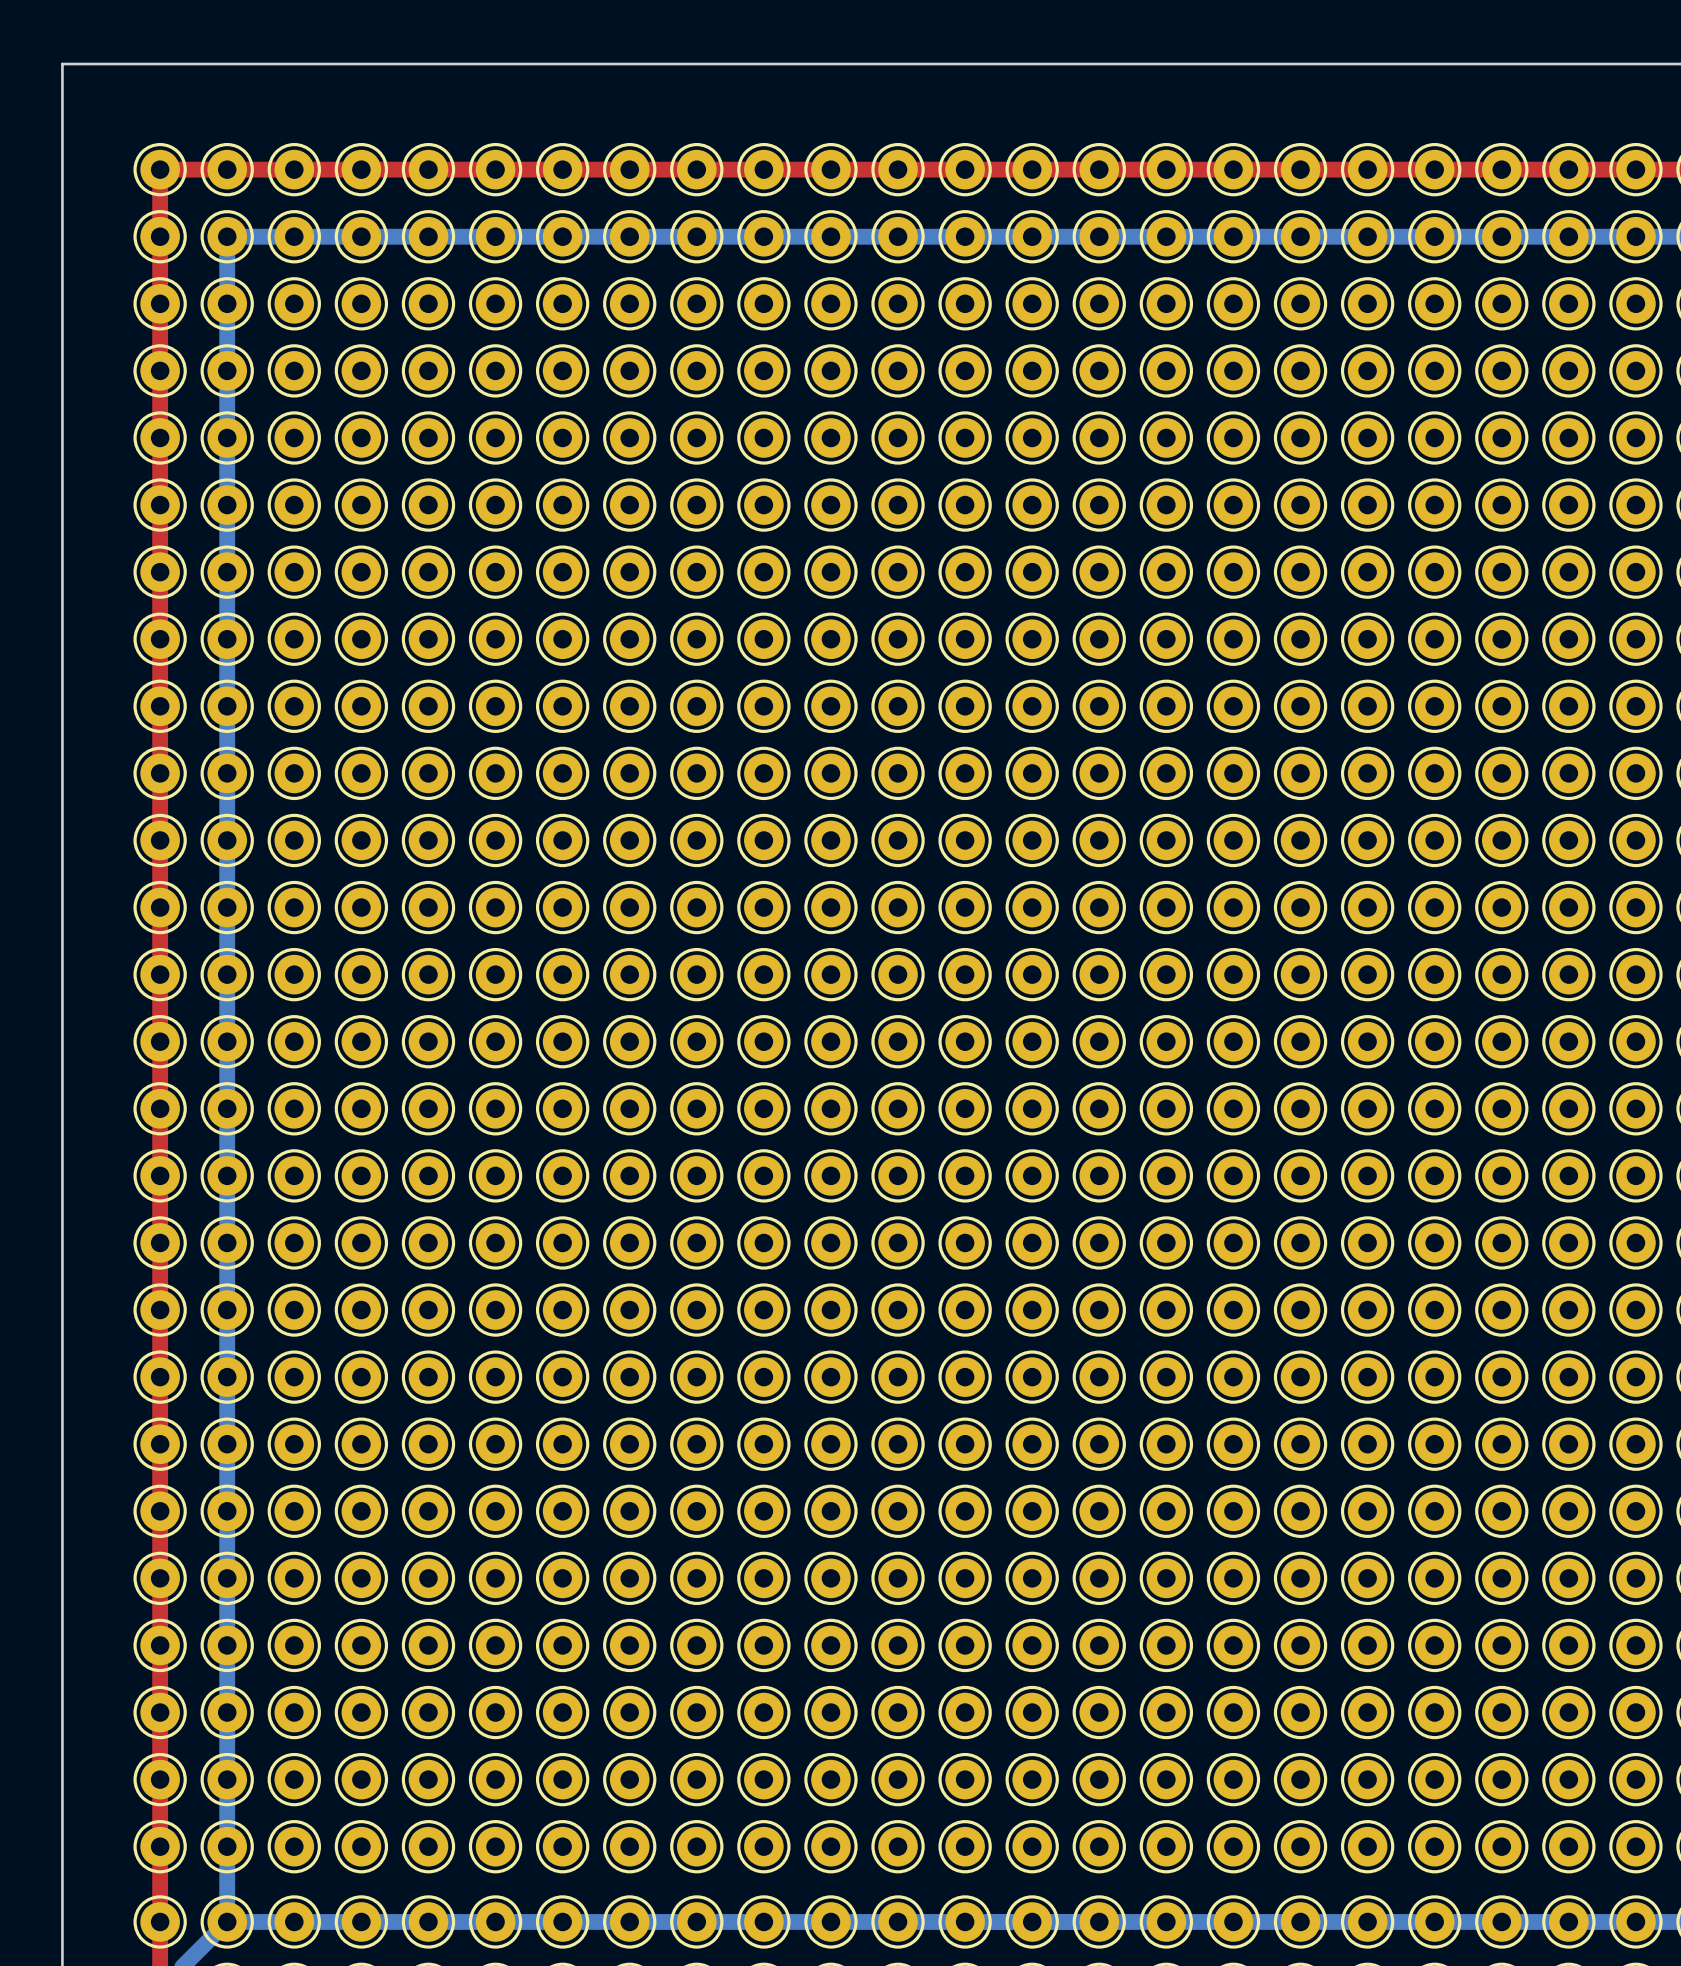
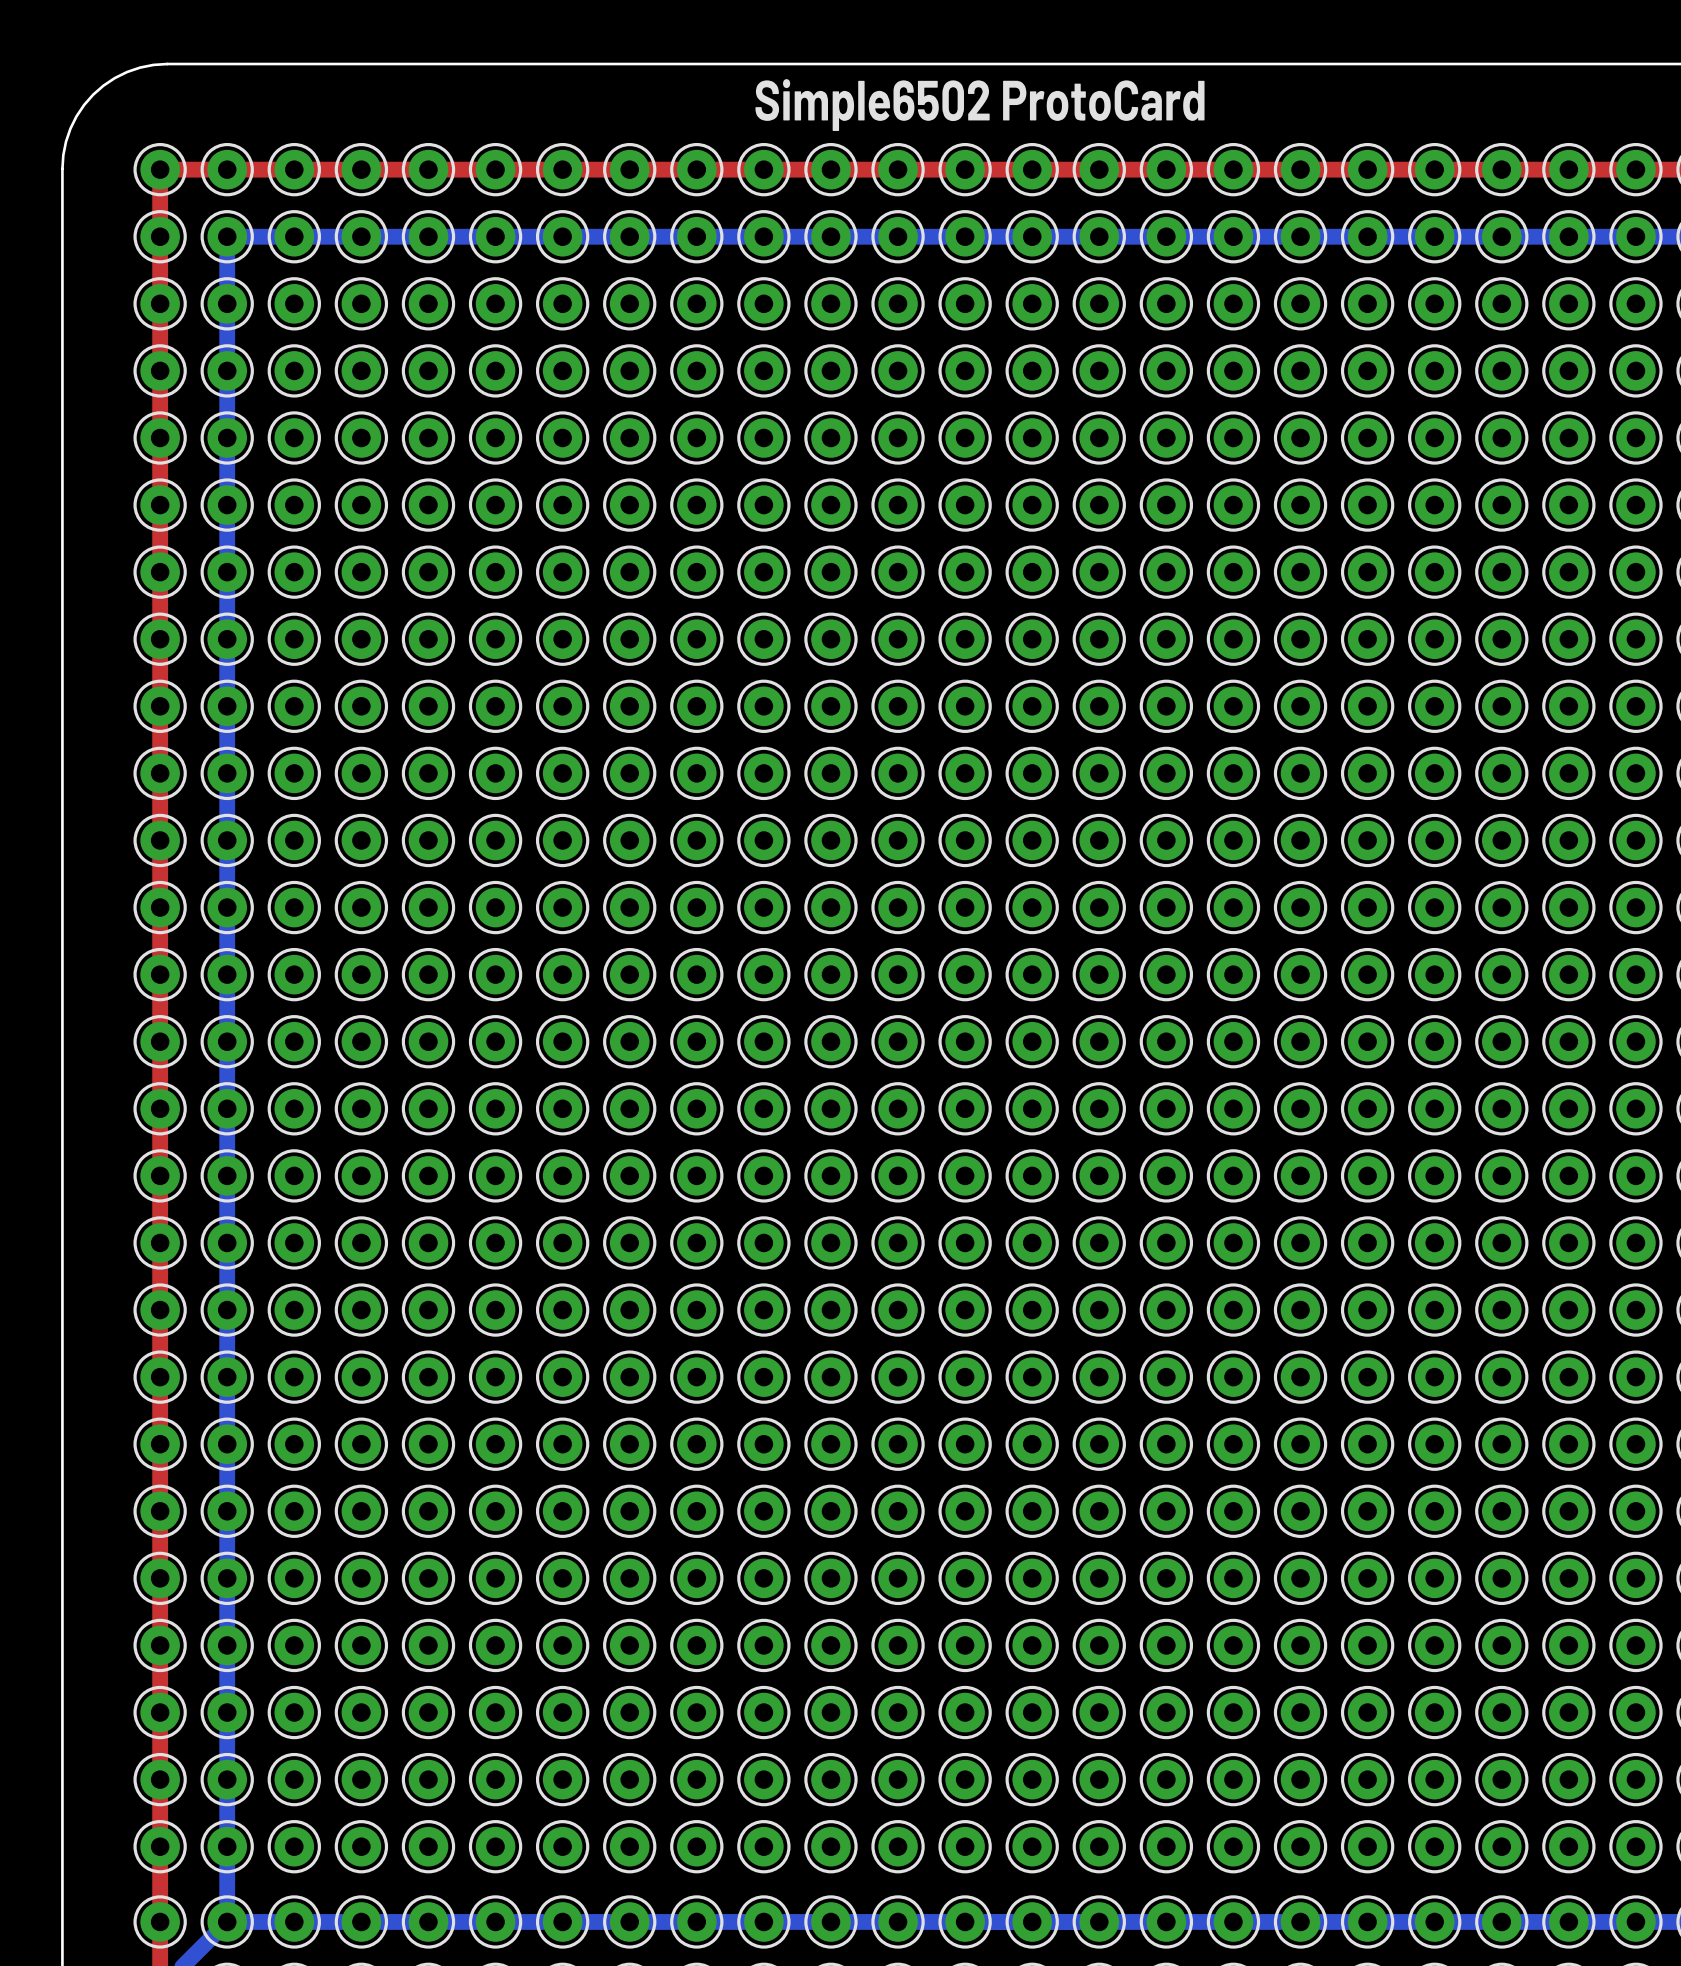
board edge: (167, 64) (62, 64) (62, 168) -> (167, 64) (140, 67) (127, 71) (114, 78) (93, 94) (76, 116) (70, 128) (63, 155) (62, 168)
text: none -> Simple6502 ProtoCard (979, 105)

